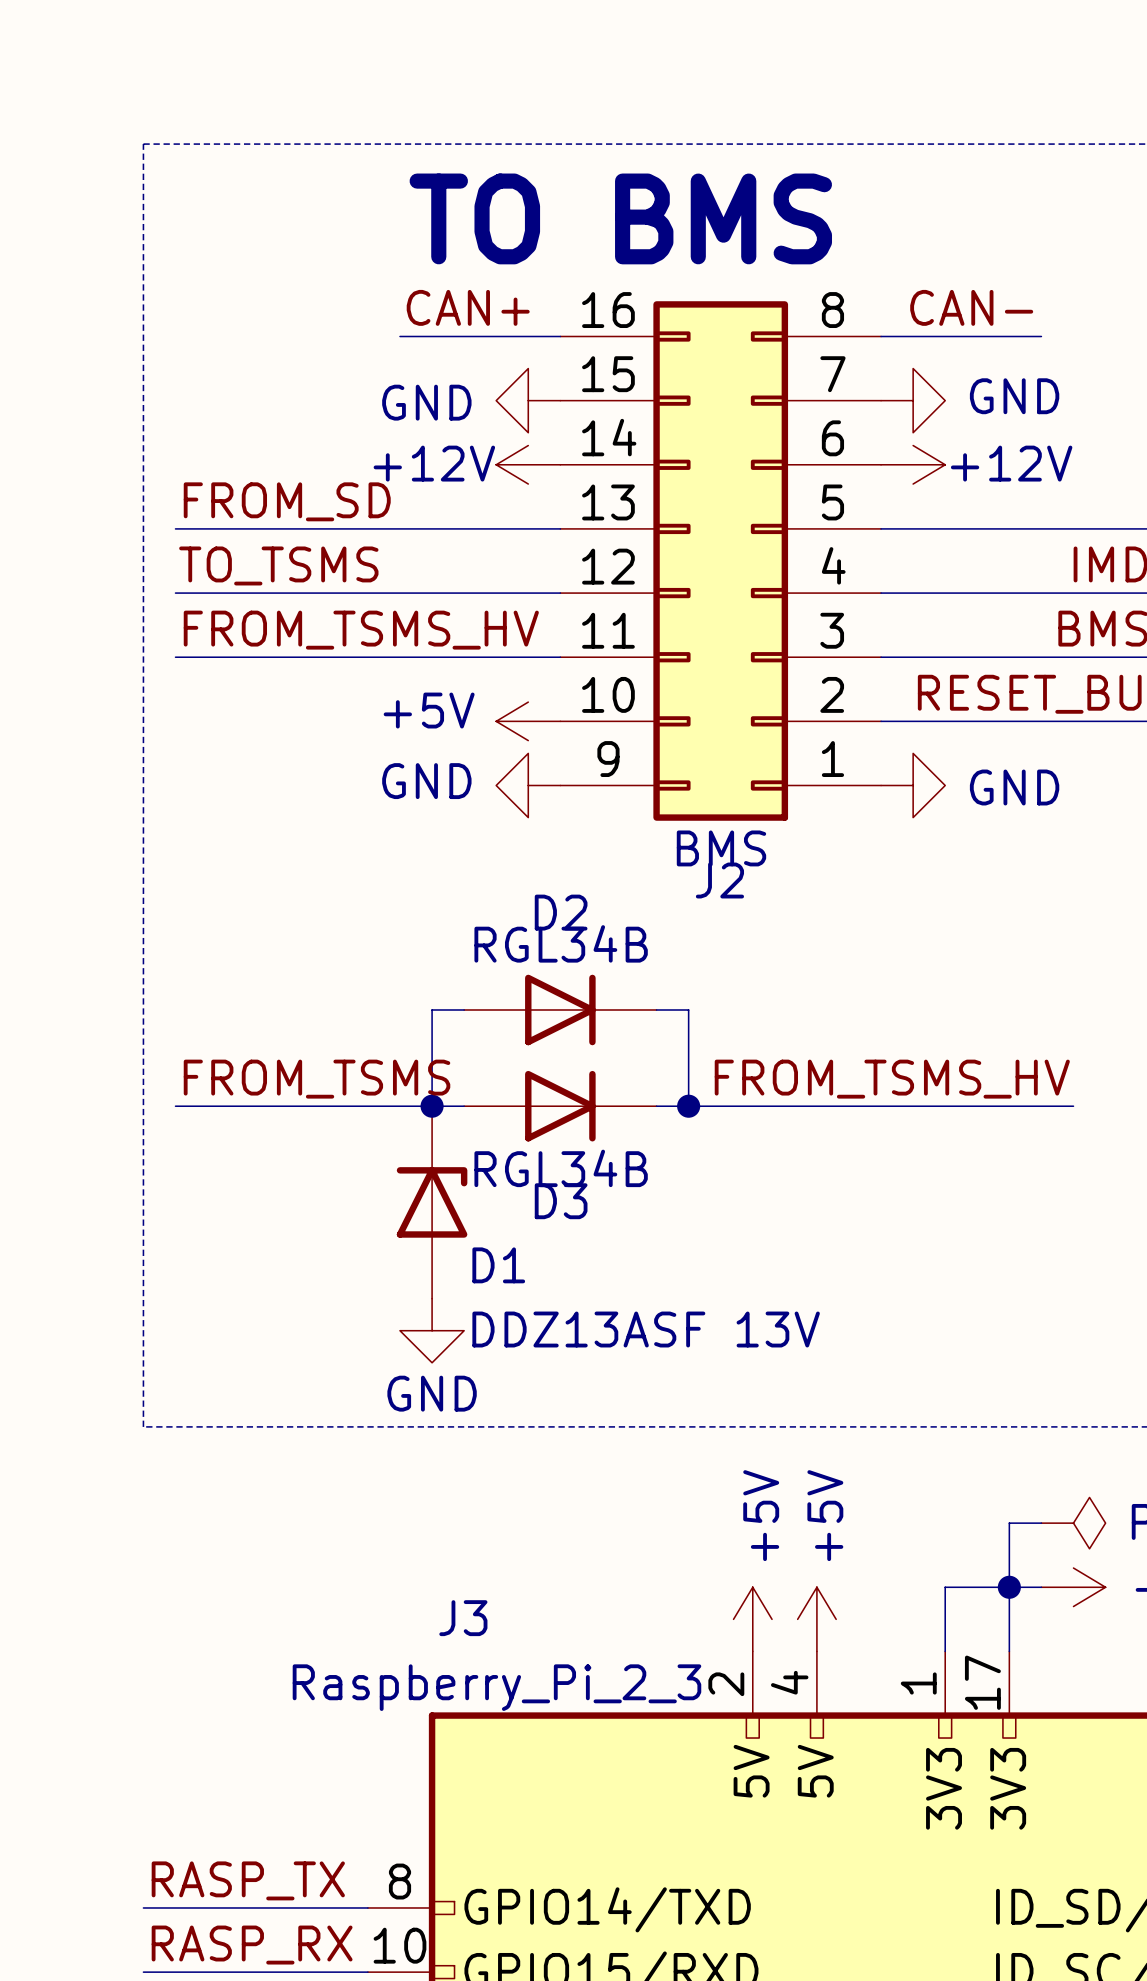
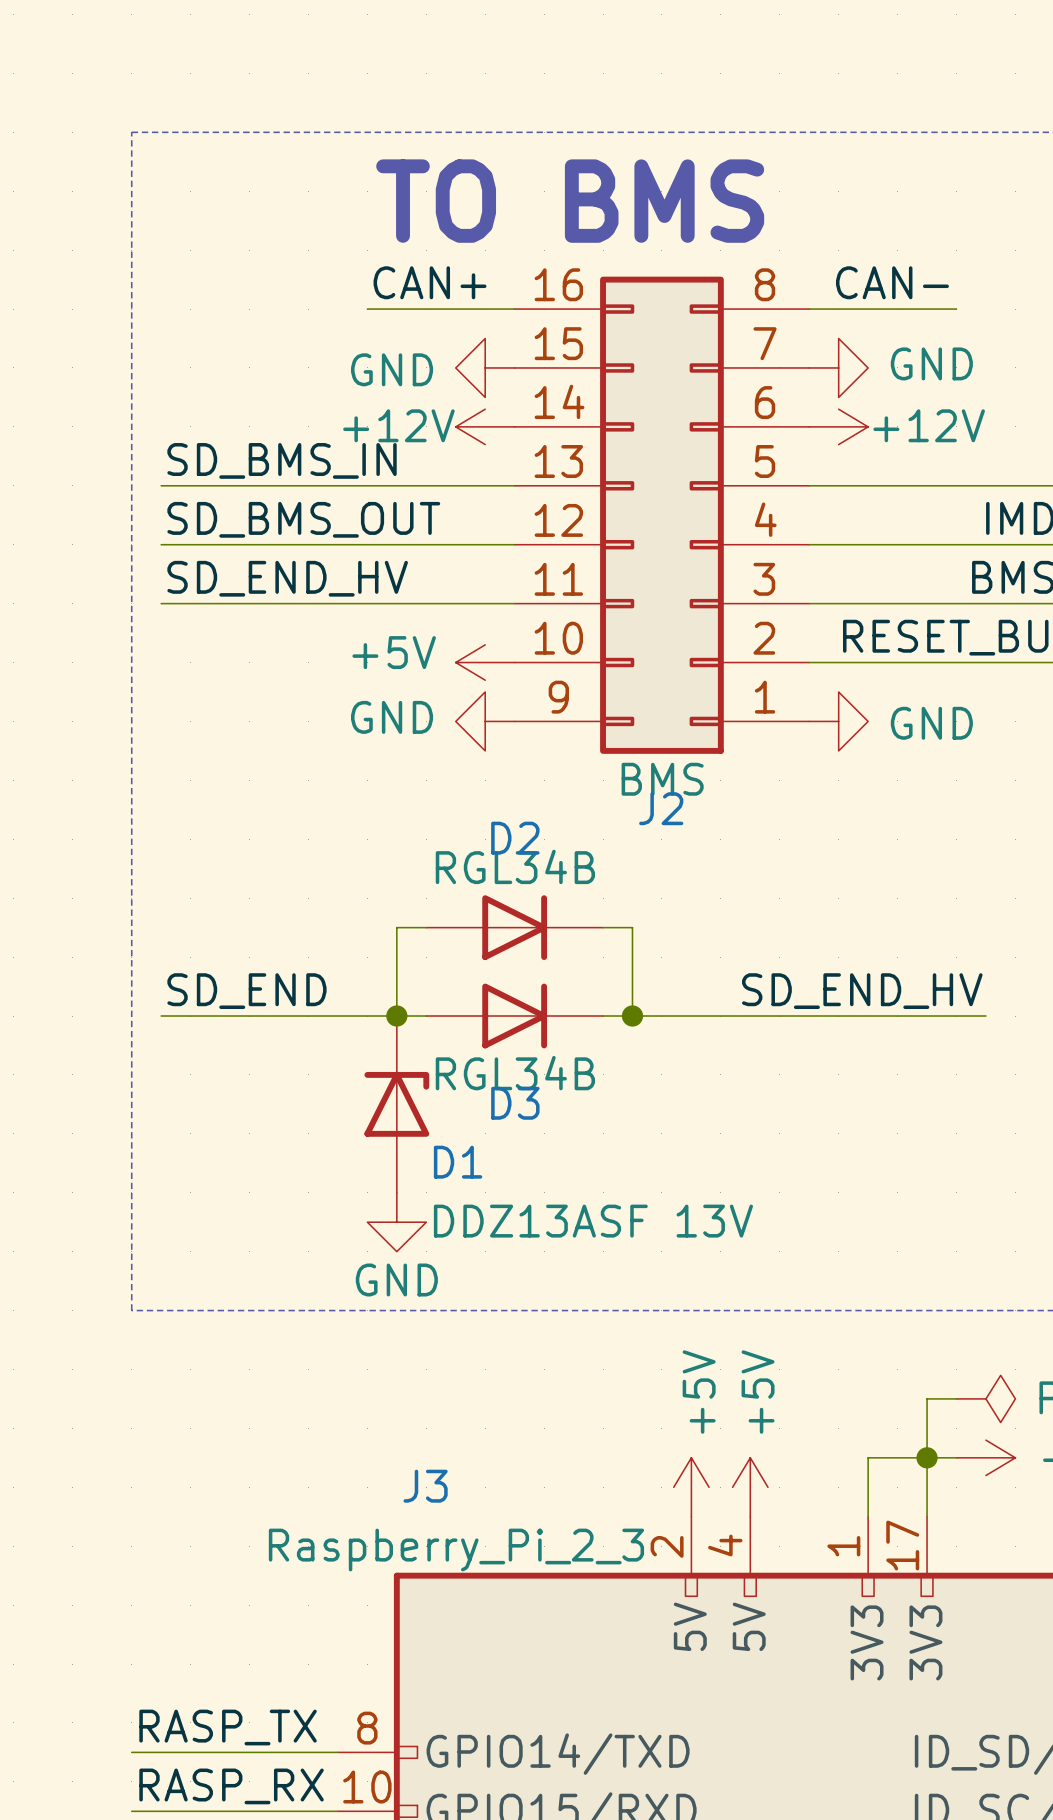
label: FROM_SD (287, 501) -> SD_BMS_IN (282, 460)
label: TO_TSMS (278, 565) -> SD_BMS_OUT (303, 519)
label: FROM_TSMS_HV (361, 630) -> SD_END_HV (287, 578)
label: FROM_TSMS (317, 1079) -> SD_END (246, 991)
label: FROM_TSMS_HV (892, 1079) -> SD_END_HV (862, 991)

